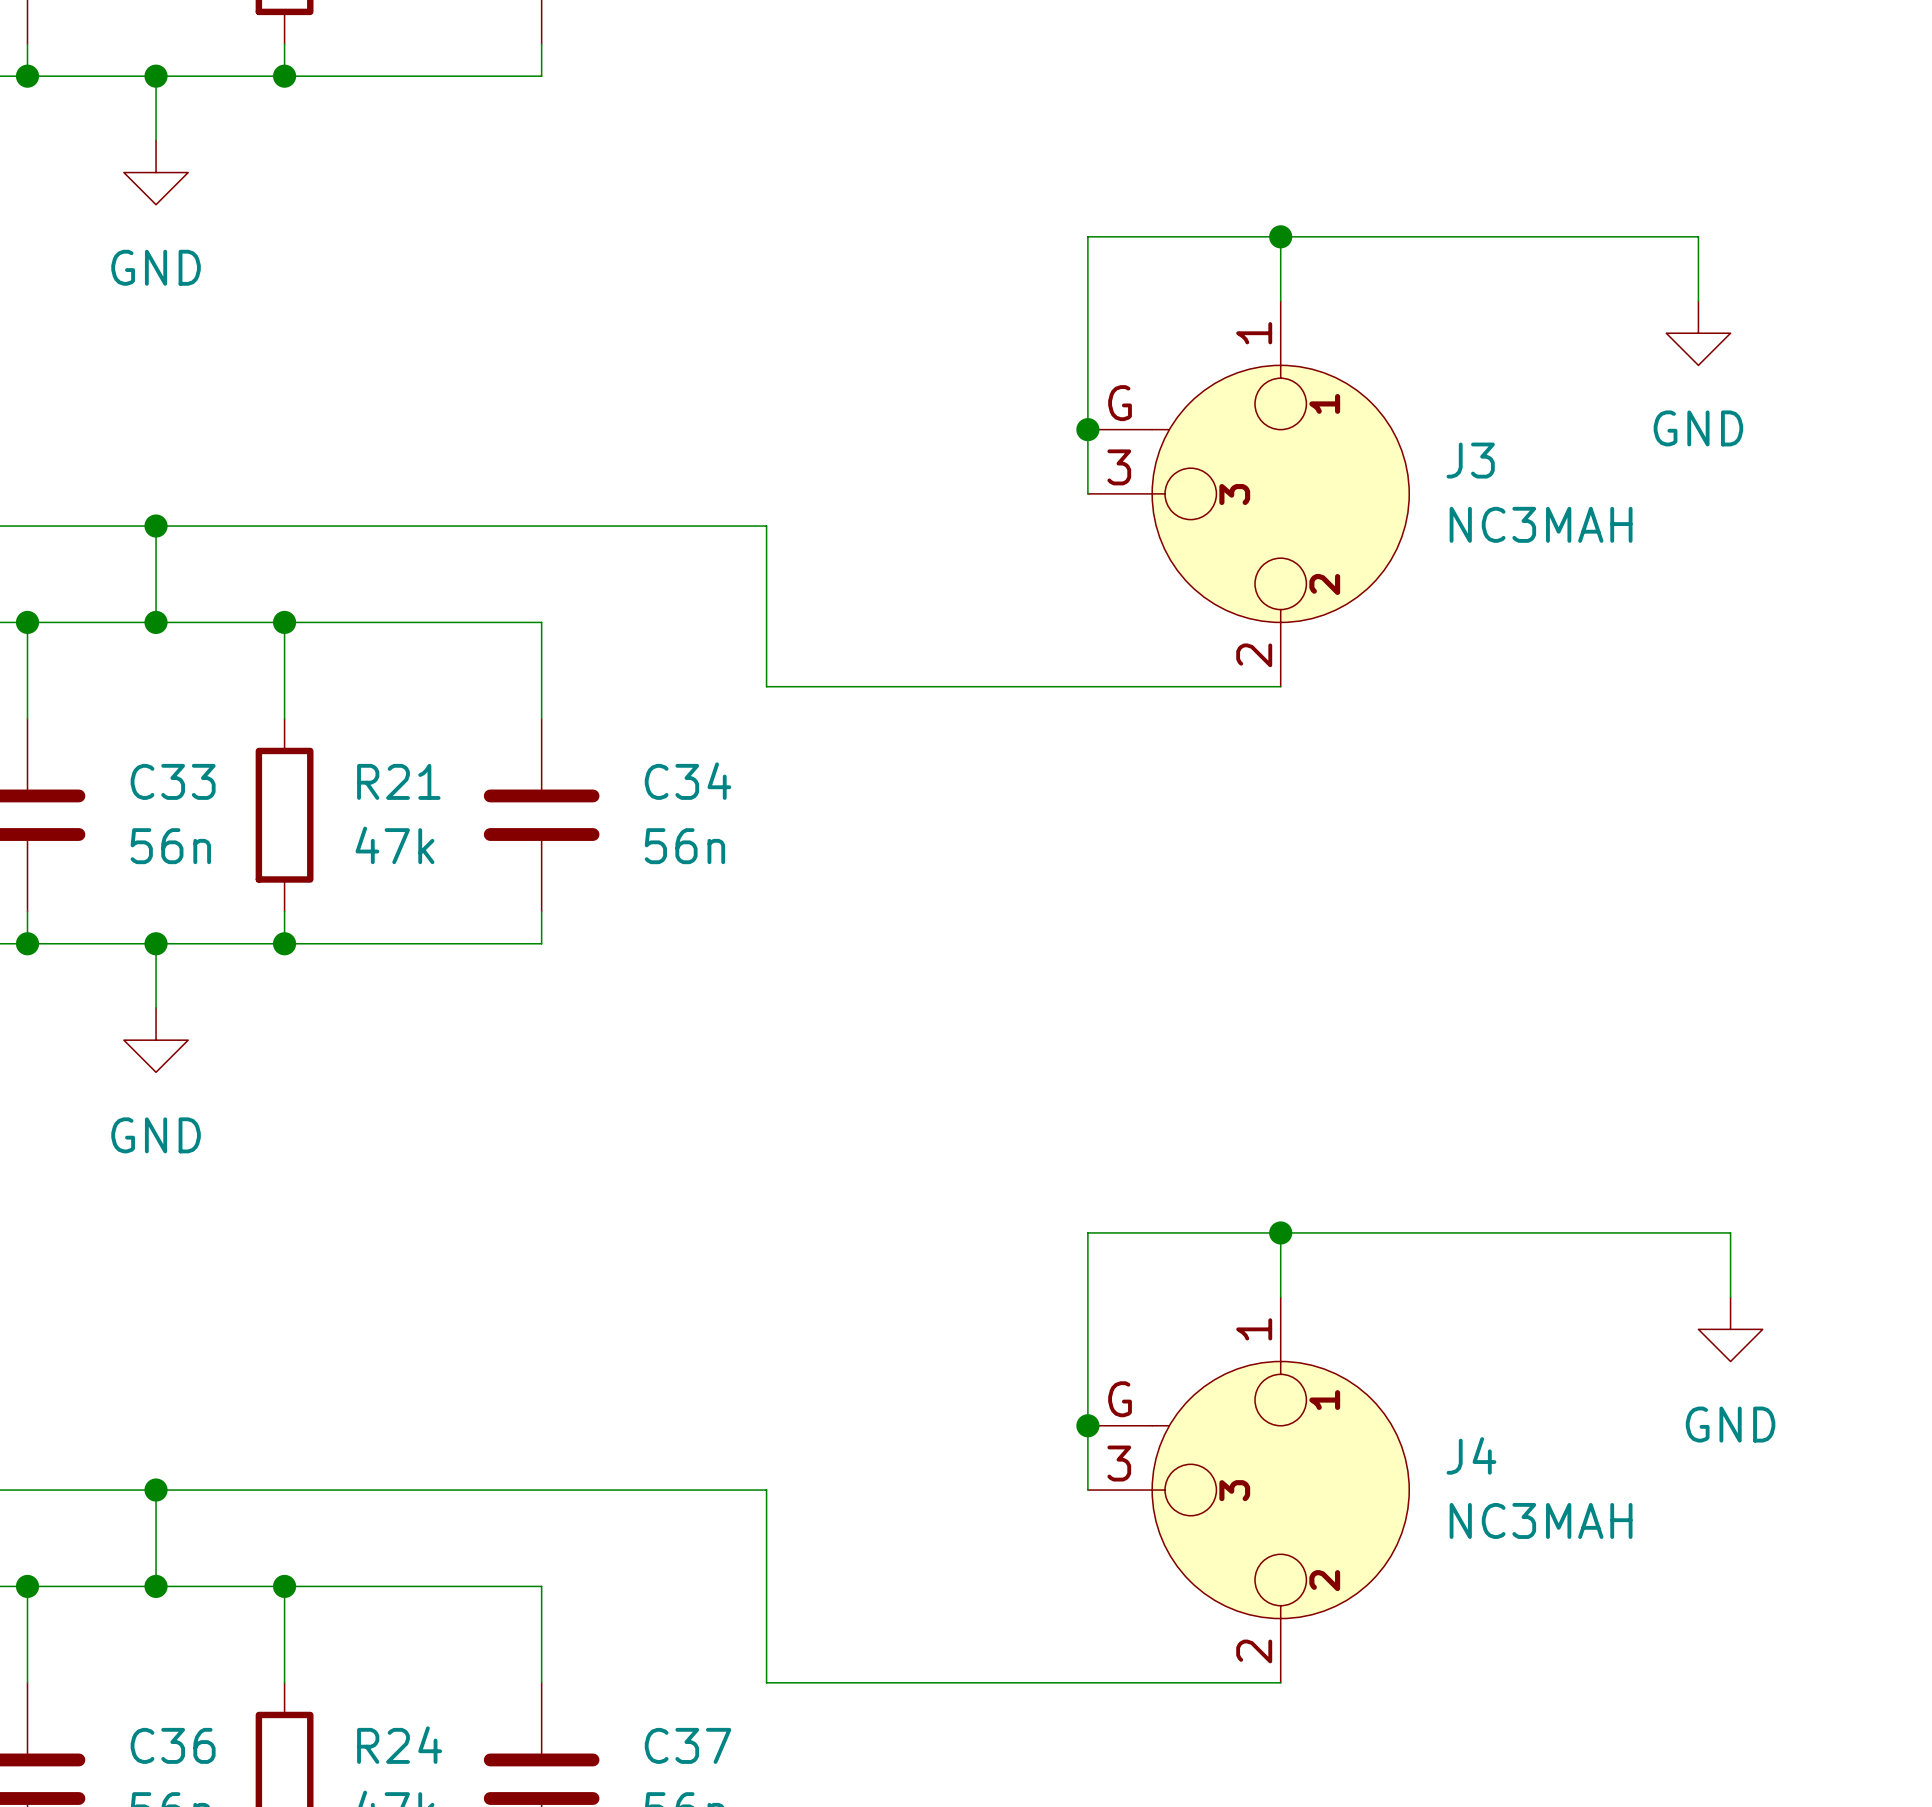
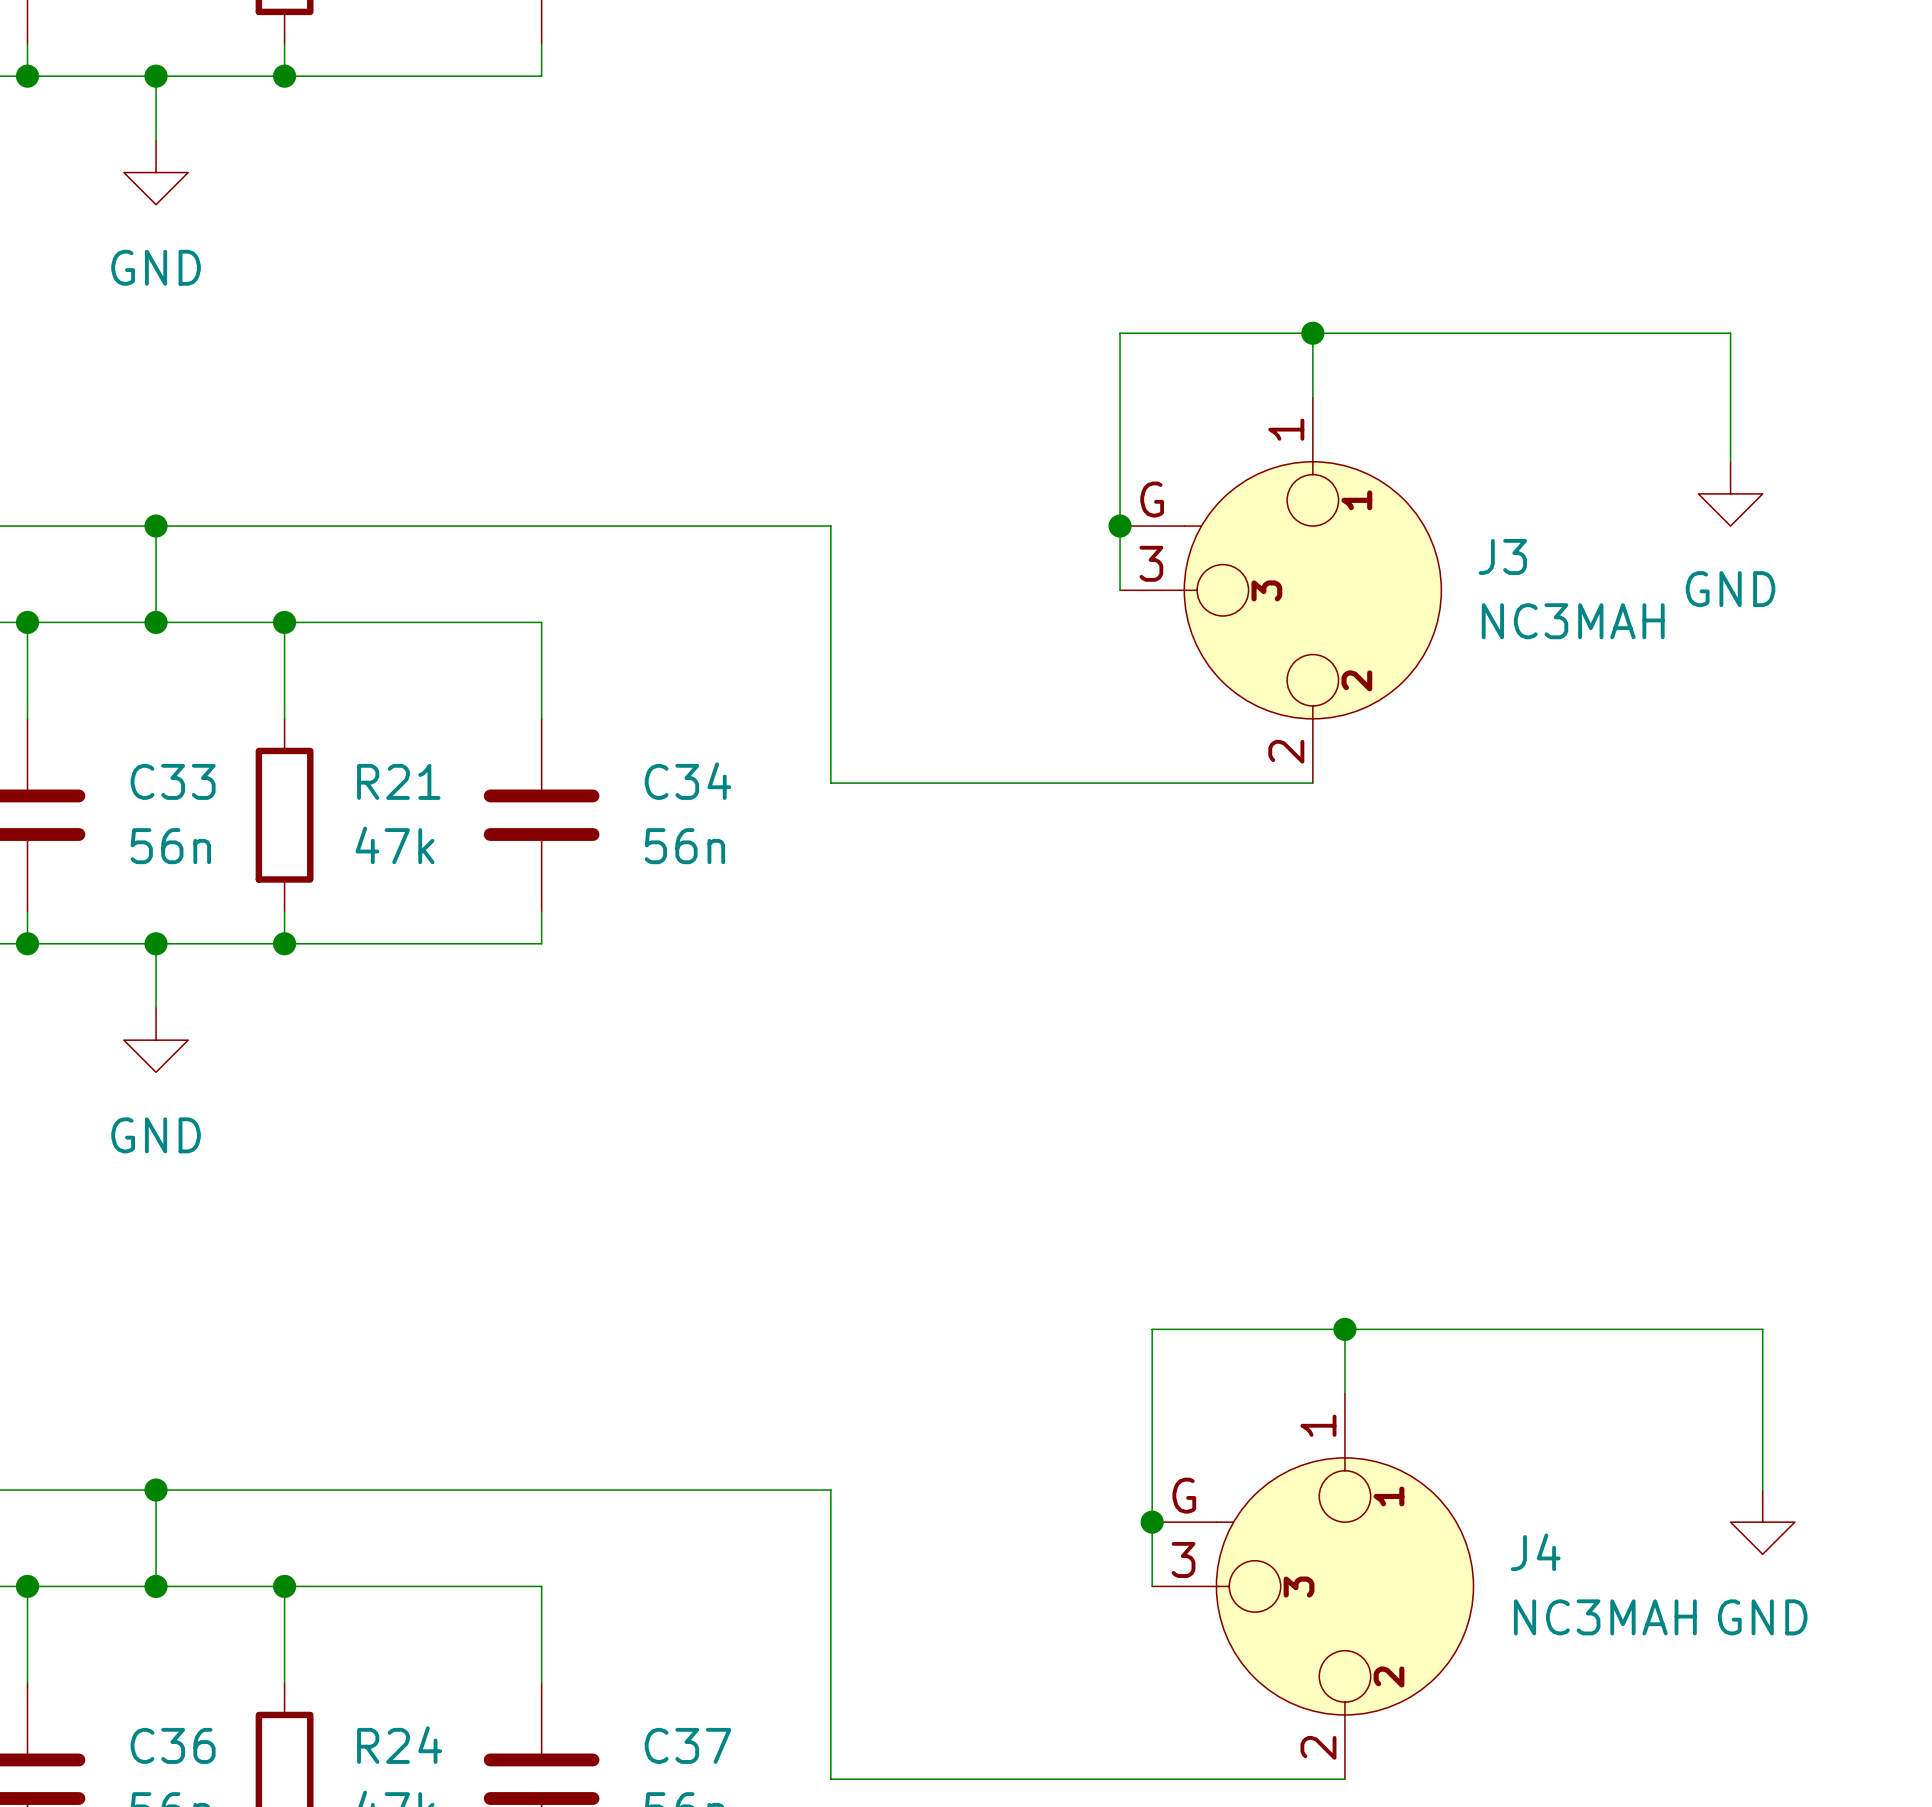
wire: (1280, 236) (1280, 301) -> (1312, 333) (1312, 397)
junction position: (1280, 236) -> (1312, 333)
wire: (1698, 301) (1698, 236) (1087, 236) (1087, 493) -> none
power symbol position: GND (1698, 333) -> GND (1730, 493)
junction position: (1087, 429) -> (1120, 526)
wire: none -> (1730, 461) (1730, 333) (1120, 333) (1120, 590)
J3 position: (1248, 493) -> (1280, 590)
wire: (766, 526) (766, 686) (1280, 686) -> (766, 526) (830, 526) (830, 783) (1312, 783)
wire: (1280, 1232) (1280, 1297) -> (1344, 1329) (1344, 1393)
junction position: (1280, 1232) -> (1344, 1329)
wire: (1730, 1297) (1730, 1232) (1087, 1232) (1087, 1490) -> none
power symbol position: GND (1730, 1329) -> GND (1762, 1522)
junction position: (1087, 1425) -> (1152, 1522)
wire: (766, 1490) (766, 1682) (1280, 1682) -> (766, 1490) (830, 1490) (830, 1779) (1344, 1779)
J4 position: (1248, 1490) -> (1312, 1586)
wire: none -> (1762, 1490) (1762, 1329) (1152, 1329) (1152, 1586)

